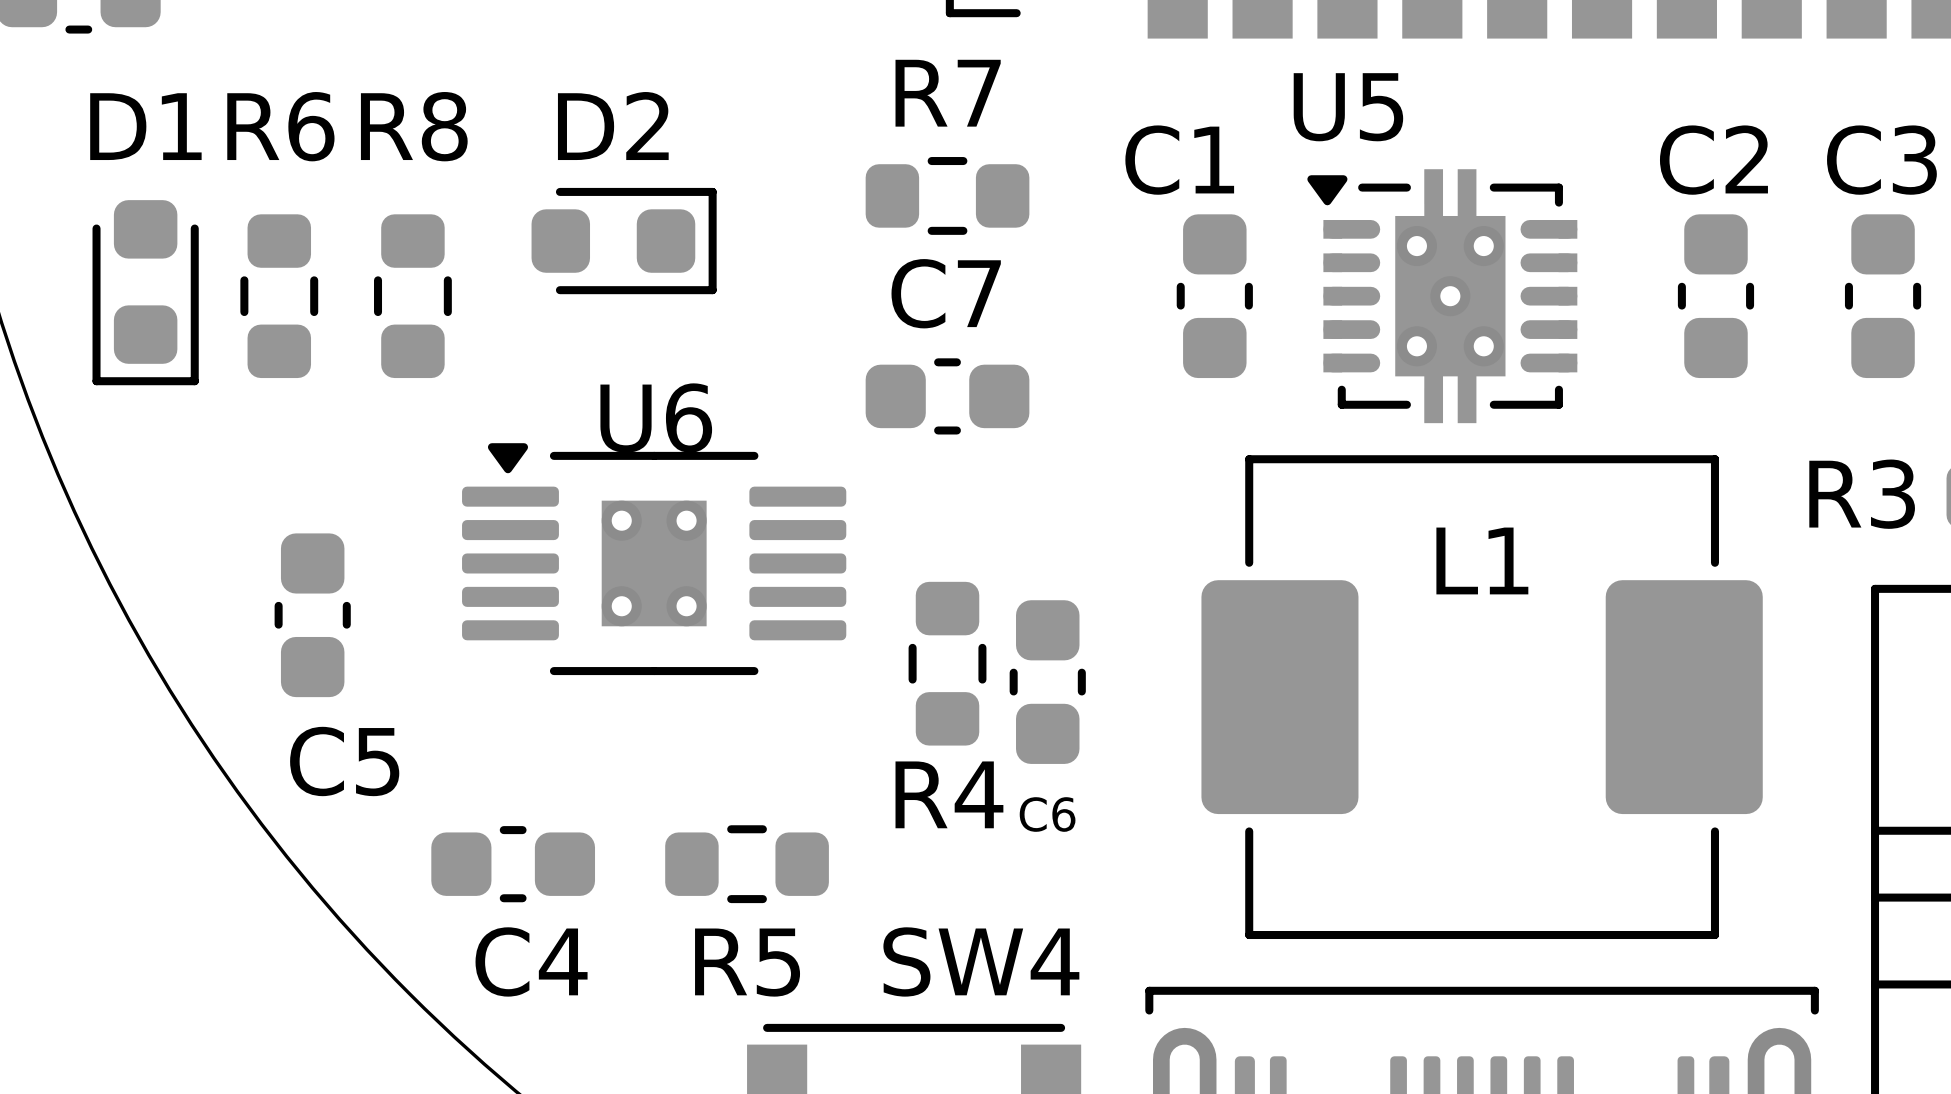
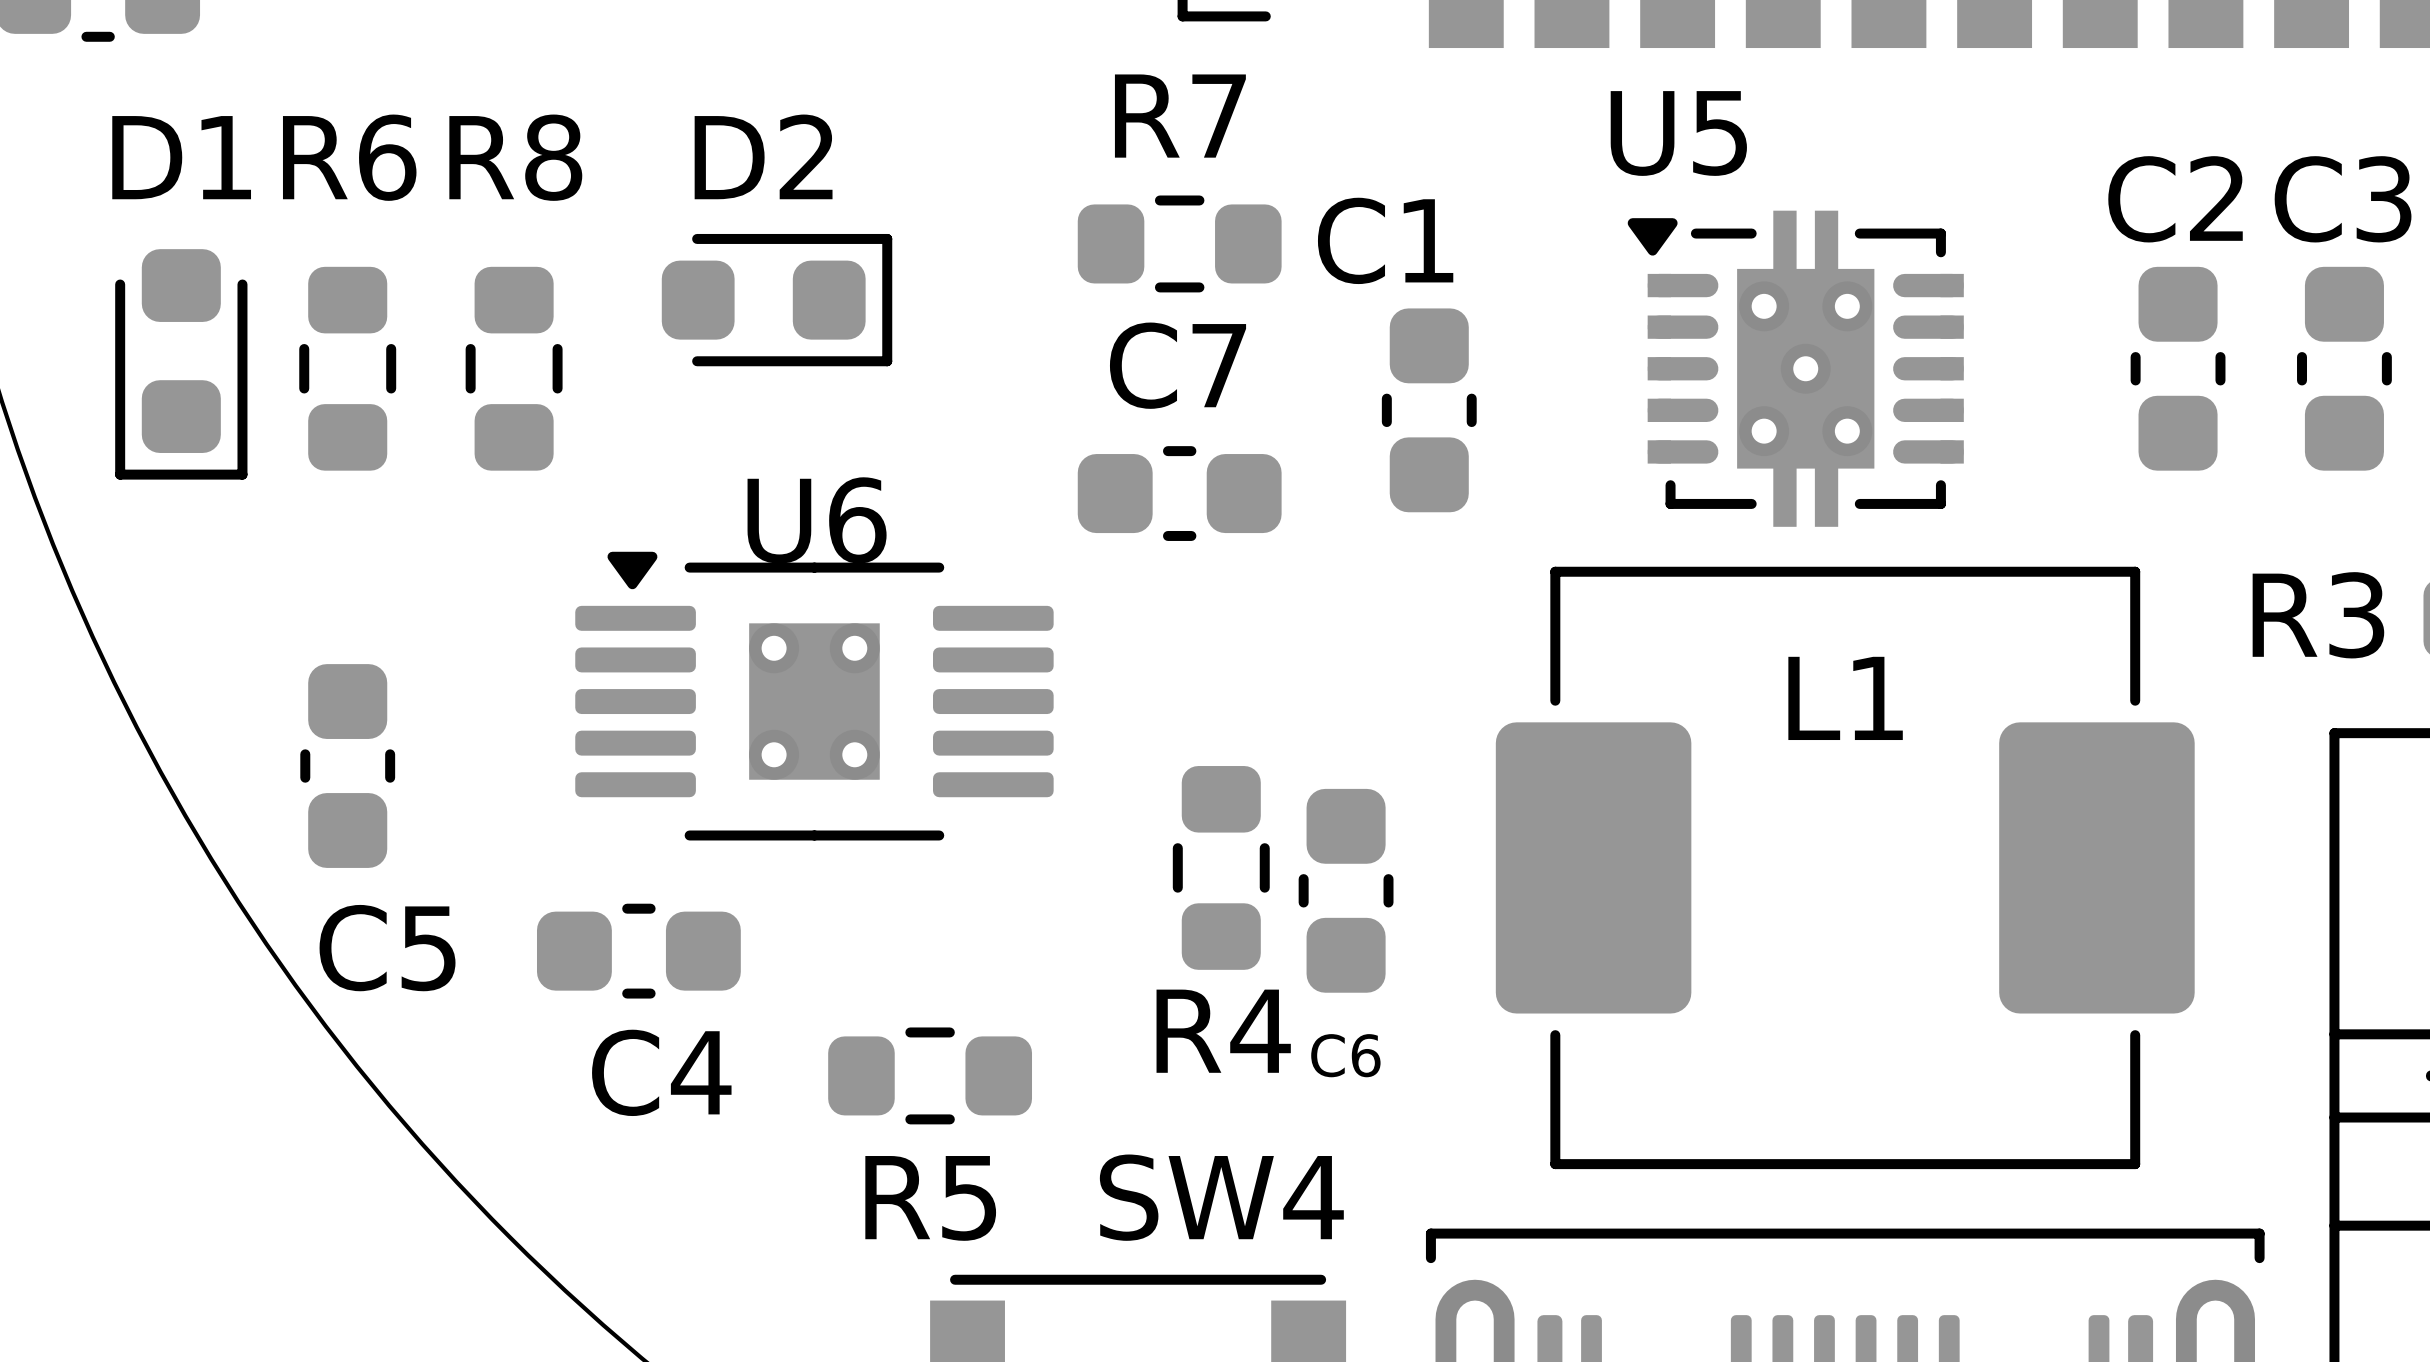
C1 position: (1214, 296) -> (1429, 410)
C2 position: (1715, 296) -> (2178, 368)
C5 position: (312, 615) -> (347, 766)
R4 position: (947, 663) -> (1221, 867)
C6 position: (1047, 682) -> (1346, 890)
C4 position: (513, 864) -> (638, 951)

